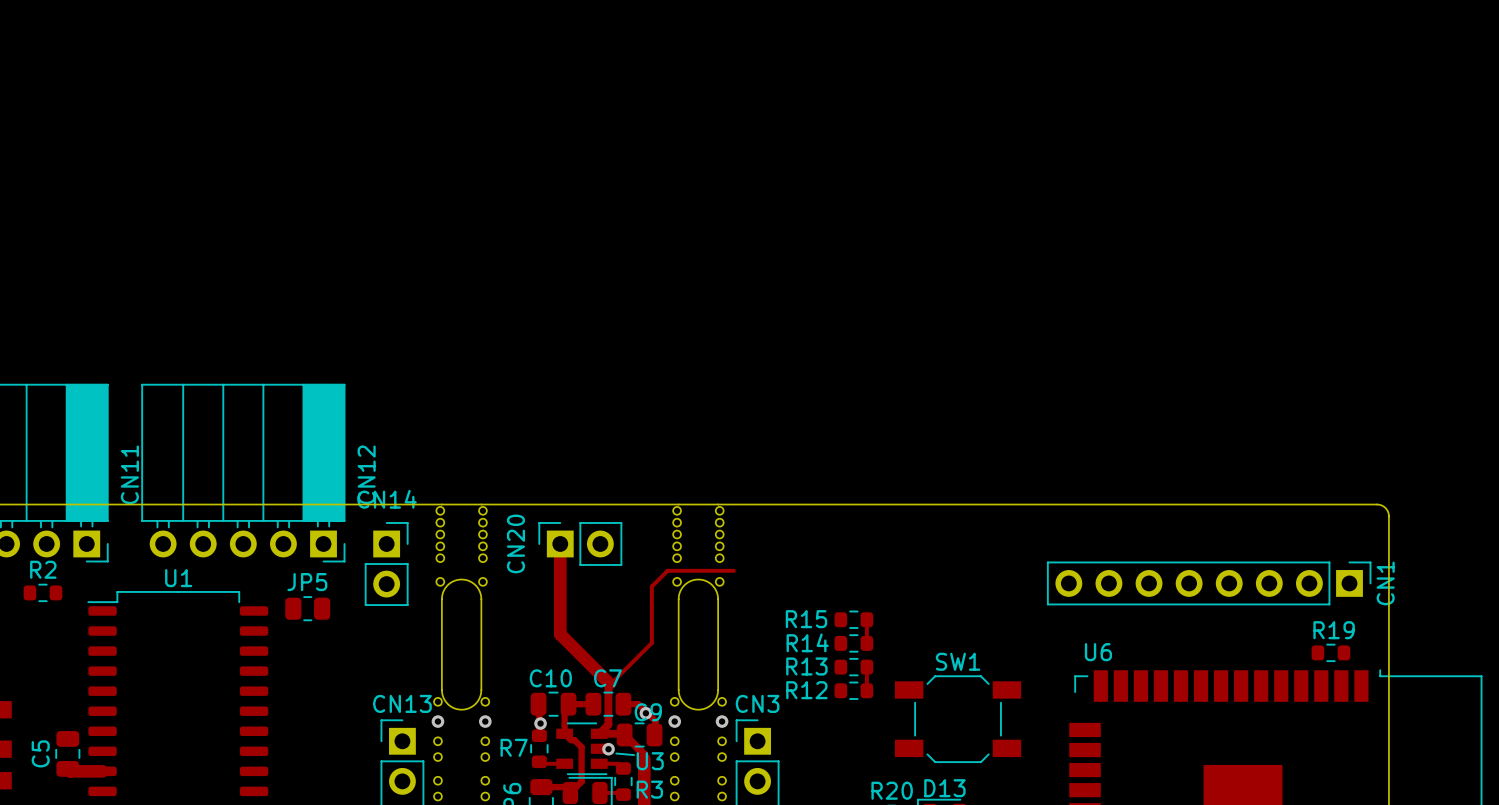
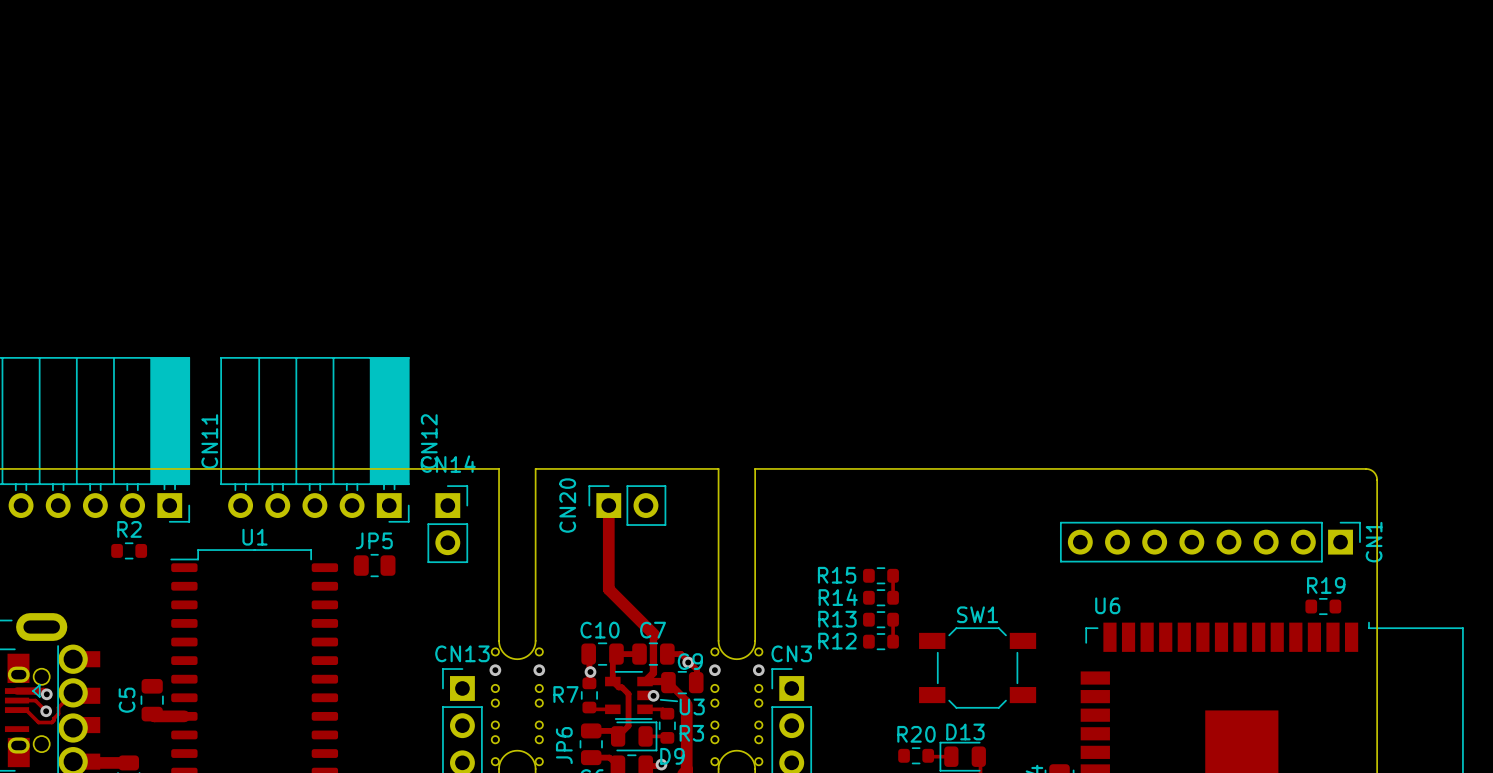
board edge: (441, 504) (481, 504) -> (499, 468) (499, 556)
board edge: (678, 504) (718, 504) -> (718, 468) (718, 556)
part: (440, 546) -> none
part: (482, 546) -> none
part: (677, 546) -> none
part: (719, 546) -> none
track: (733, 570) (667, 570) (651, 586) (651, 643) (608, 686) -> none
board edge: (441, 599) (443, 591) (447, 585) (454, 580) (461, 579) (469, 580) (475, 585) (479, 591) (481, 599) -> (535, 468) (535, 556)
board edge: (678, 599) (680, 591) (684, 585) (690, 580) (698, 579) (705, 580) (712, 585) (716, 591) (718, 599) -> (755, 468) (755, 556)

